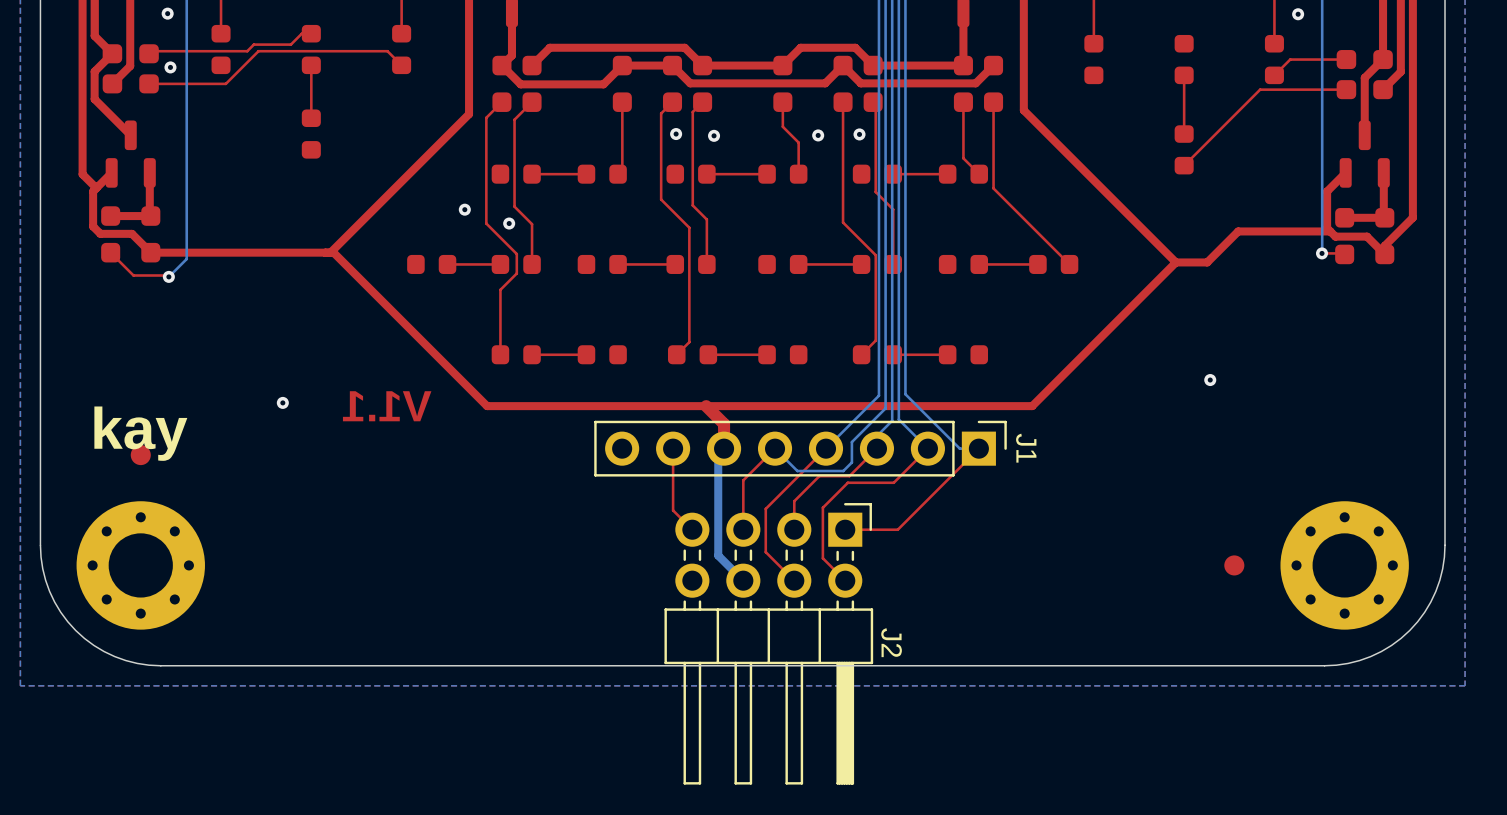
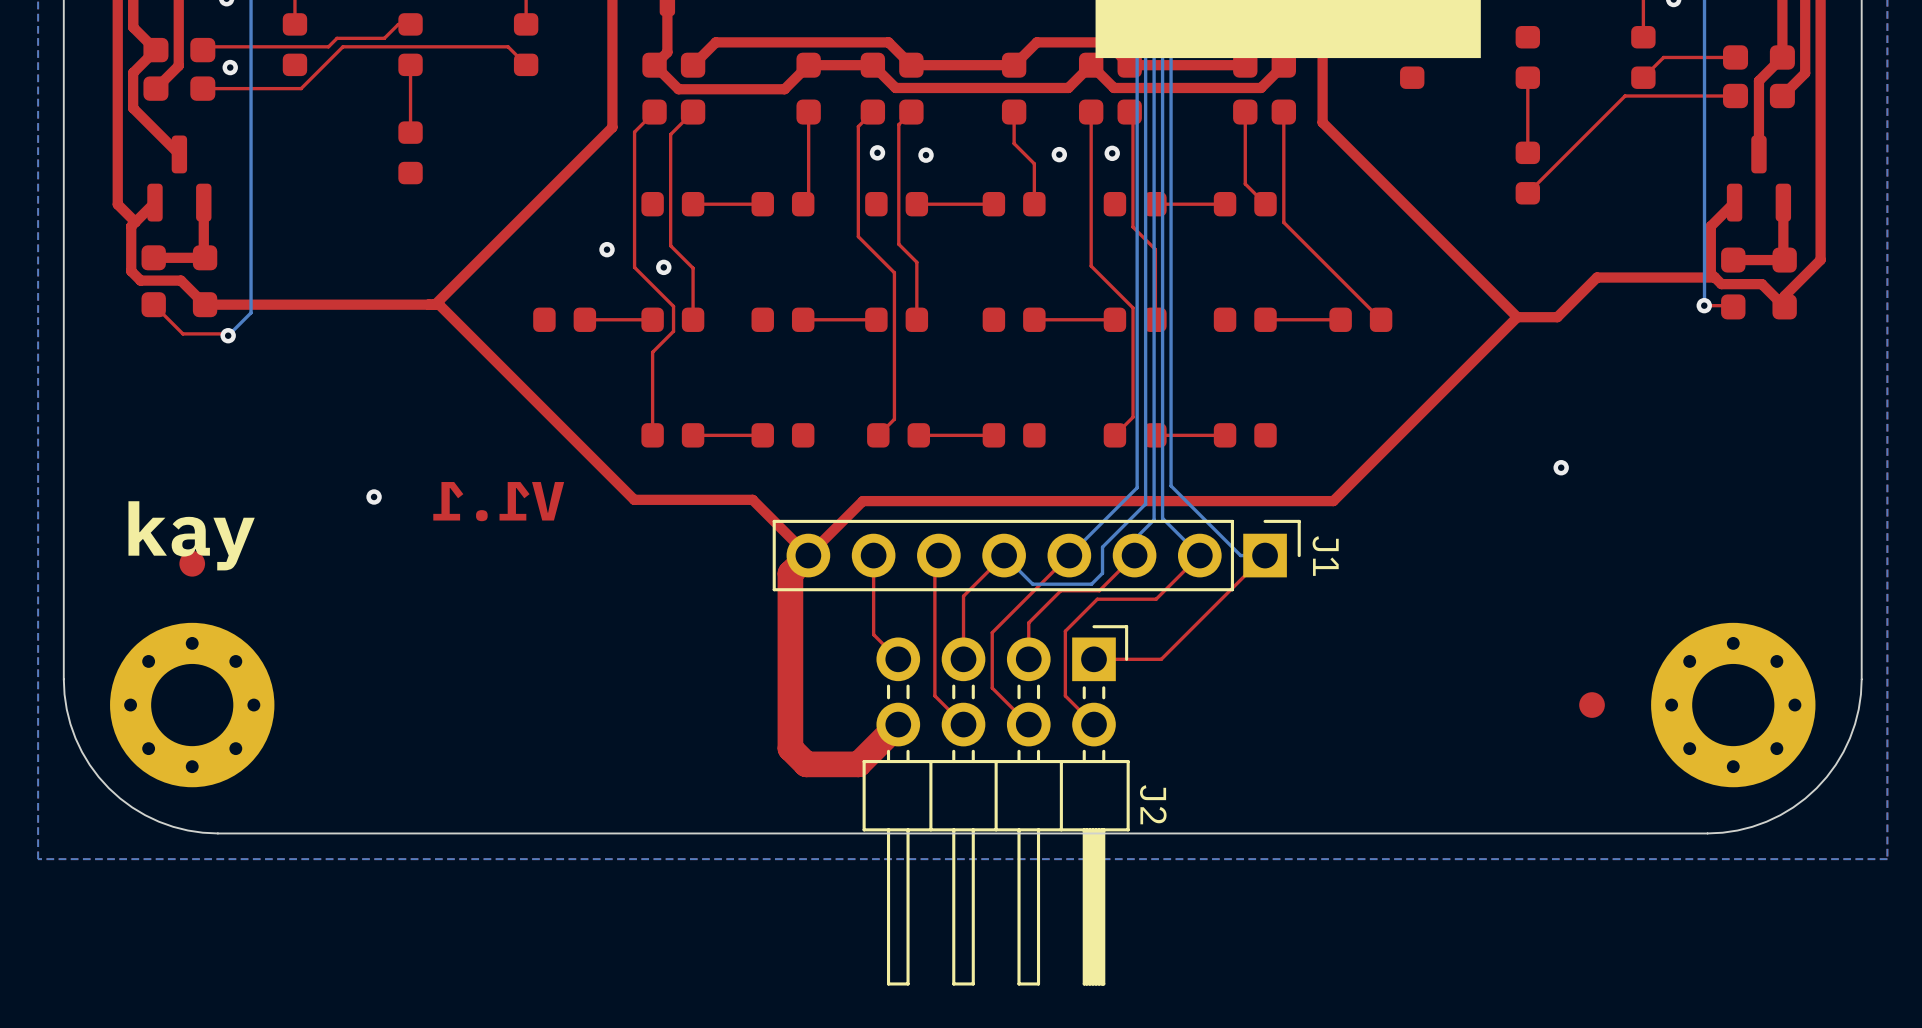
top track: (486, 405) (664, 406) -> (634, 499) (752, 499) (808, 555)
top track: none -> (862, 501) (808, 555)
top track: (706, 406) (724, 423) (724, 448) -> (963, 724) (934, 695) (934, 559) (938, 555)
top track: none -> (808, 555) (790, 573) (790, 748) (806, 764) (858, 764) (898, 724)
bottom track: (724, 448) (718, 454) (718, 555) (743, 580) -> none

